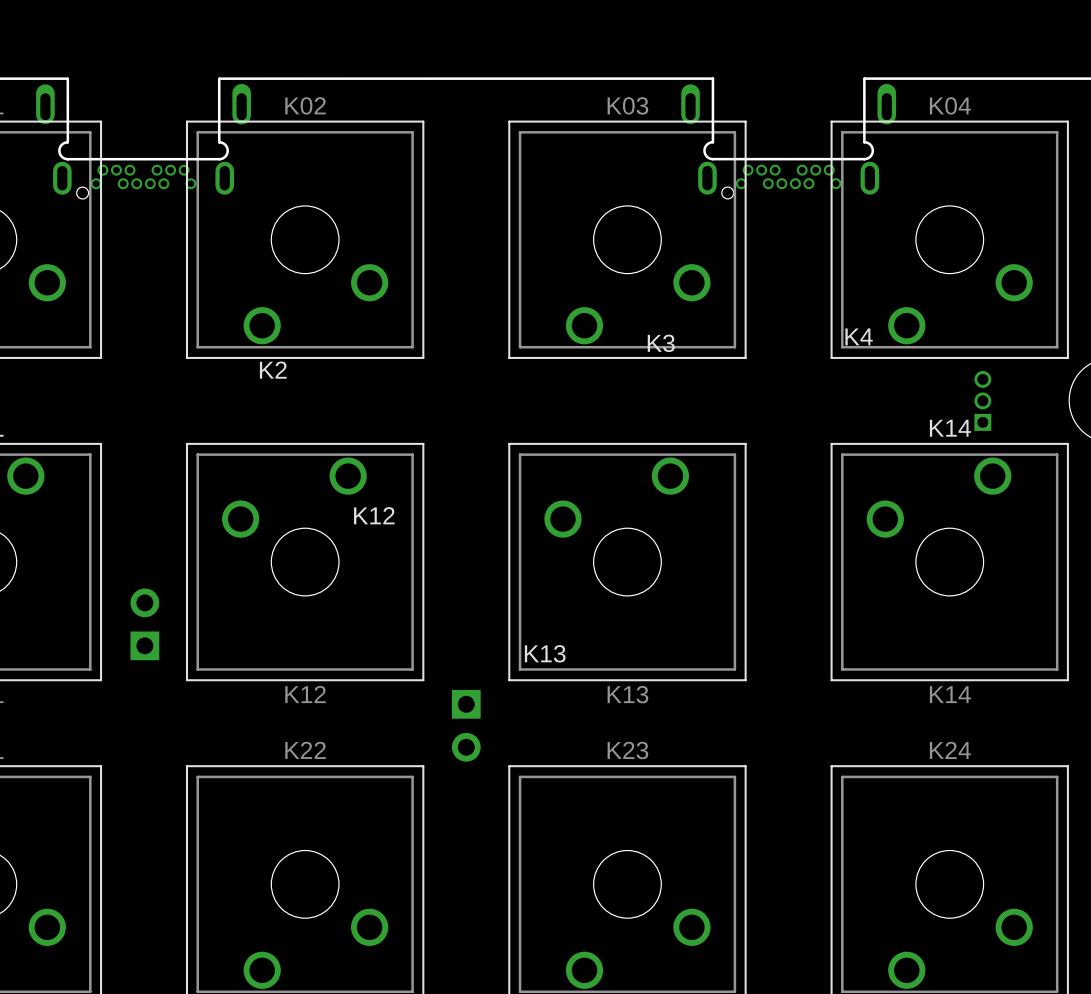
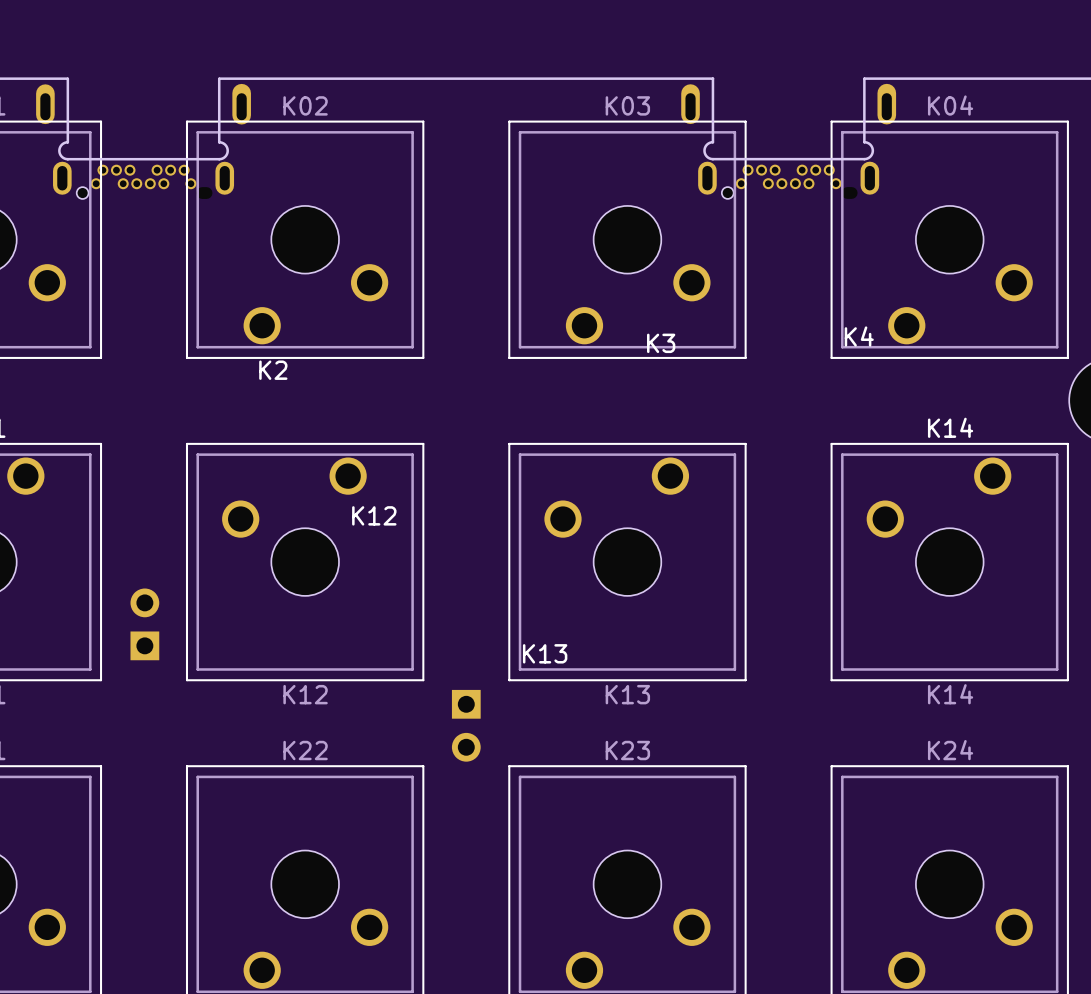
part: (982, 400) -> none

